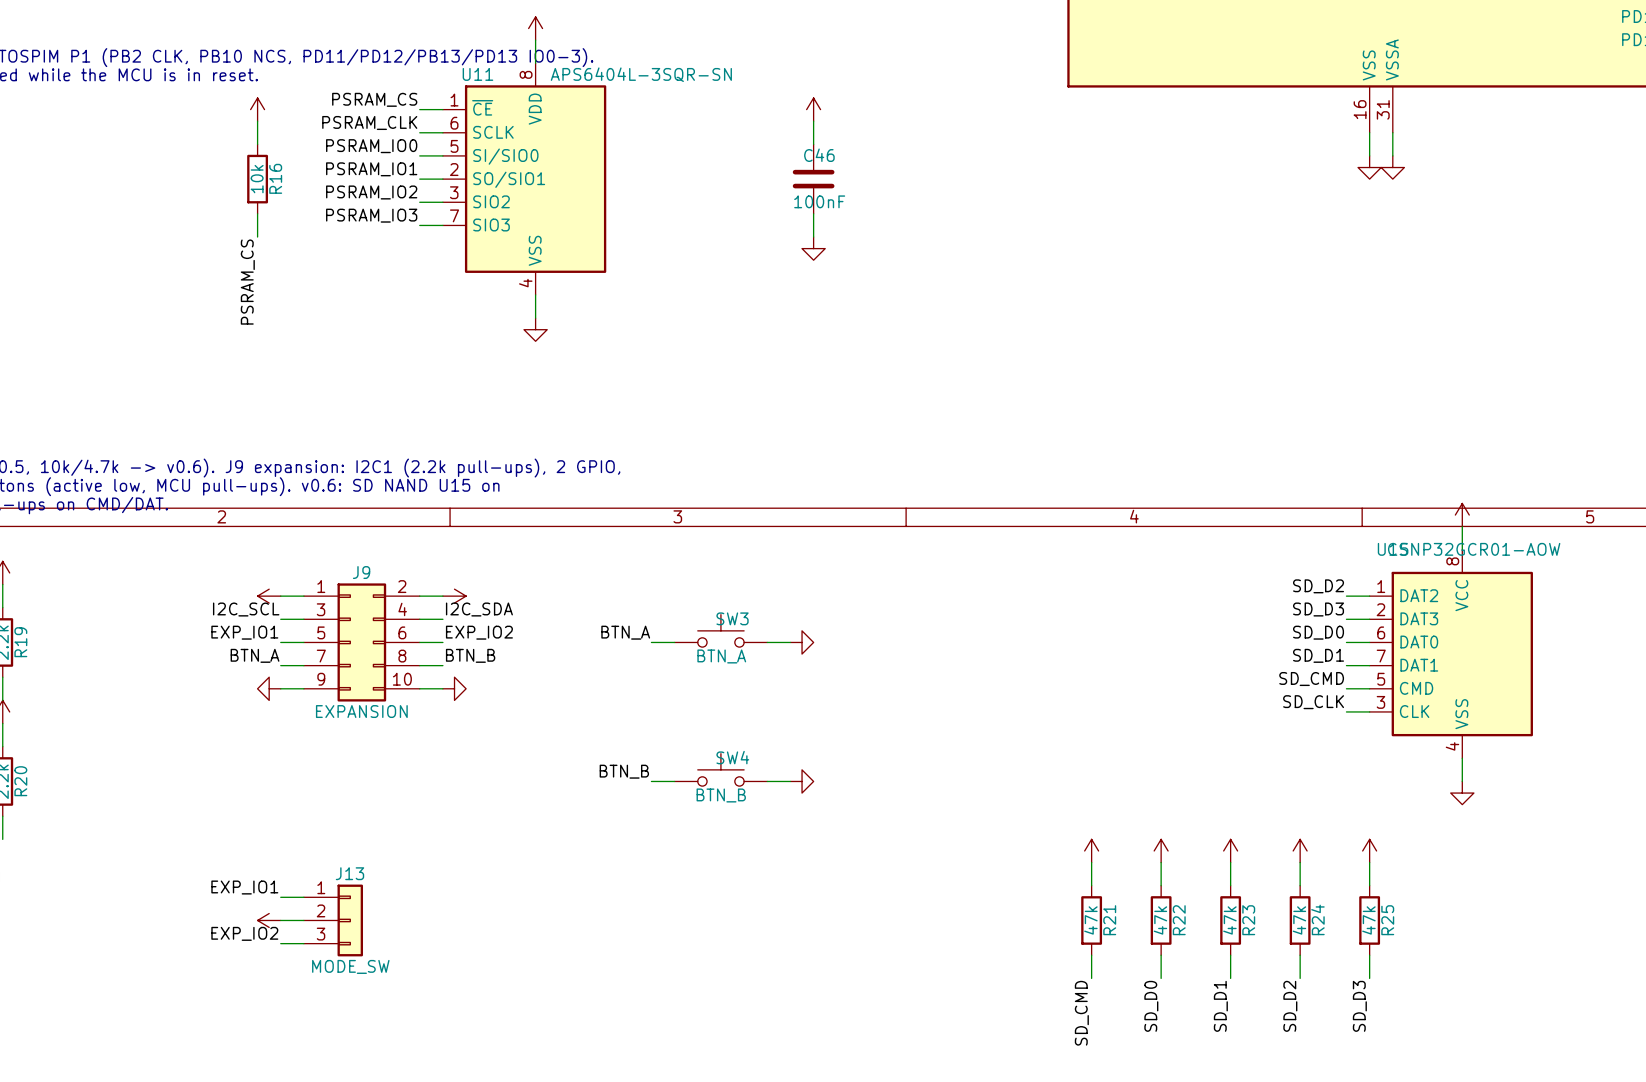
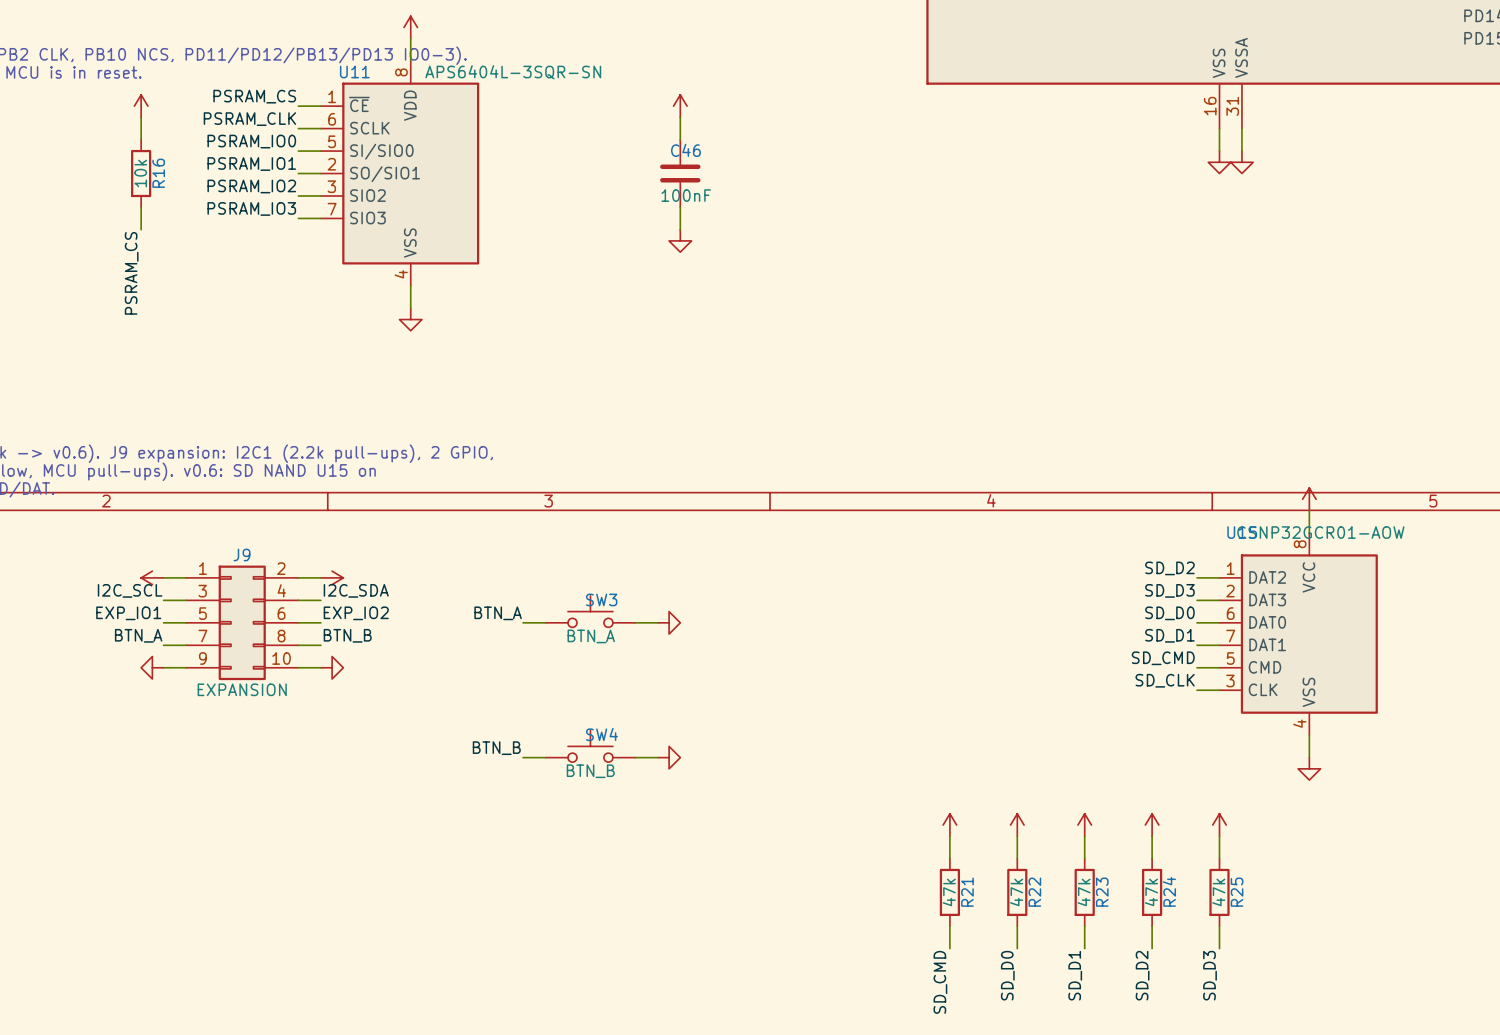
label: EXP_IO1 (244, 887) -> none
wire: (280, 897) (303, 897) -> none
power symbol: (269, 920) -> none
wire: (280, 920) (303, 920) -> none
J13: MODE_SW (333, 920) -> none
label: EXP_IO2 (244, 933) -> none
wire: (280, 943) (303, 943) -> none

